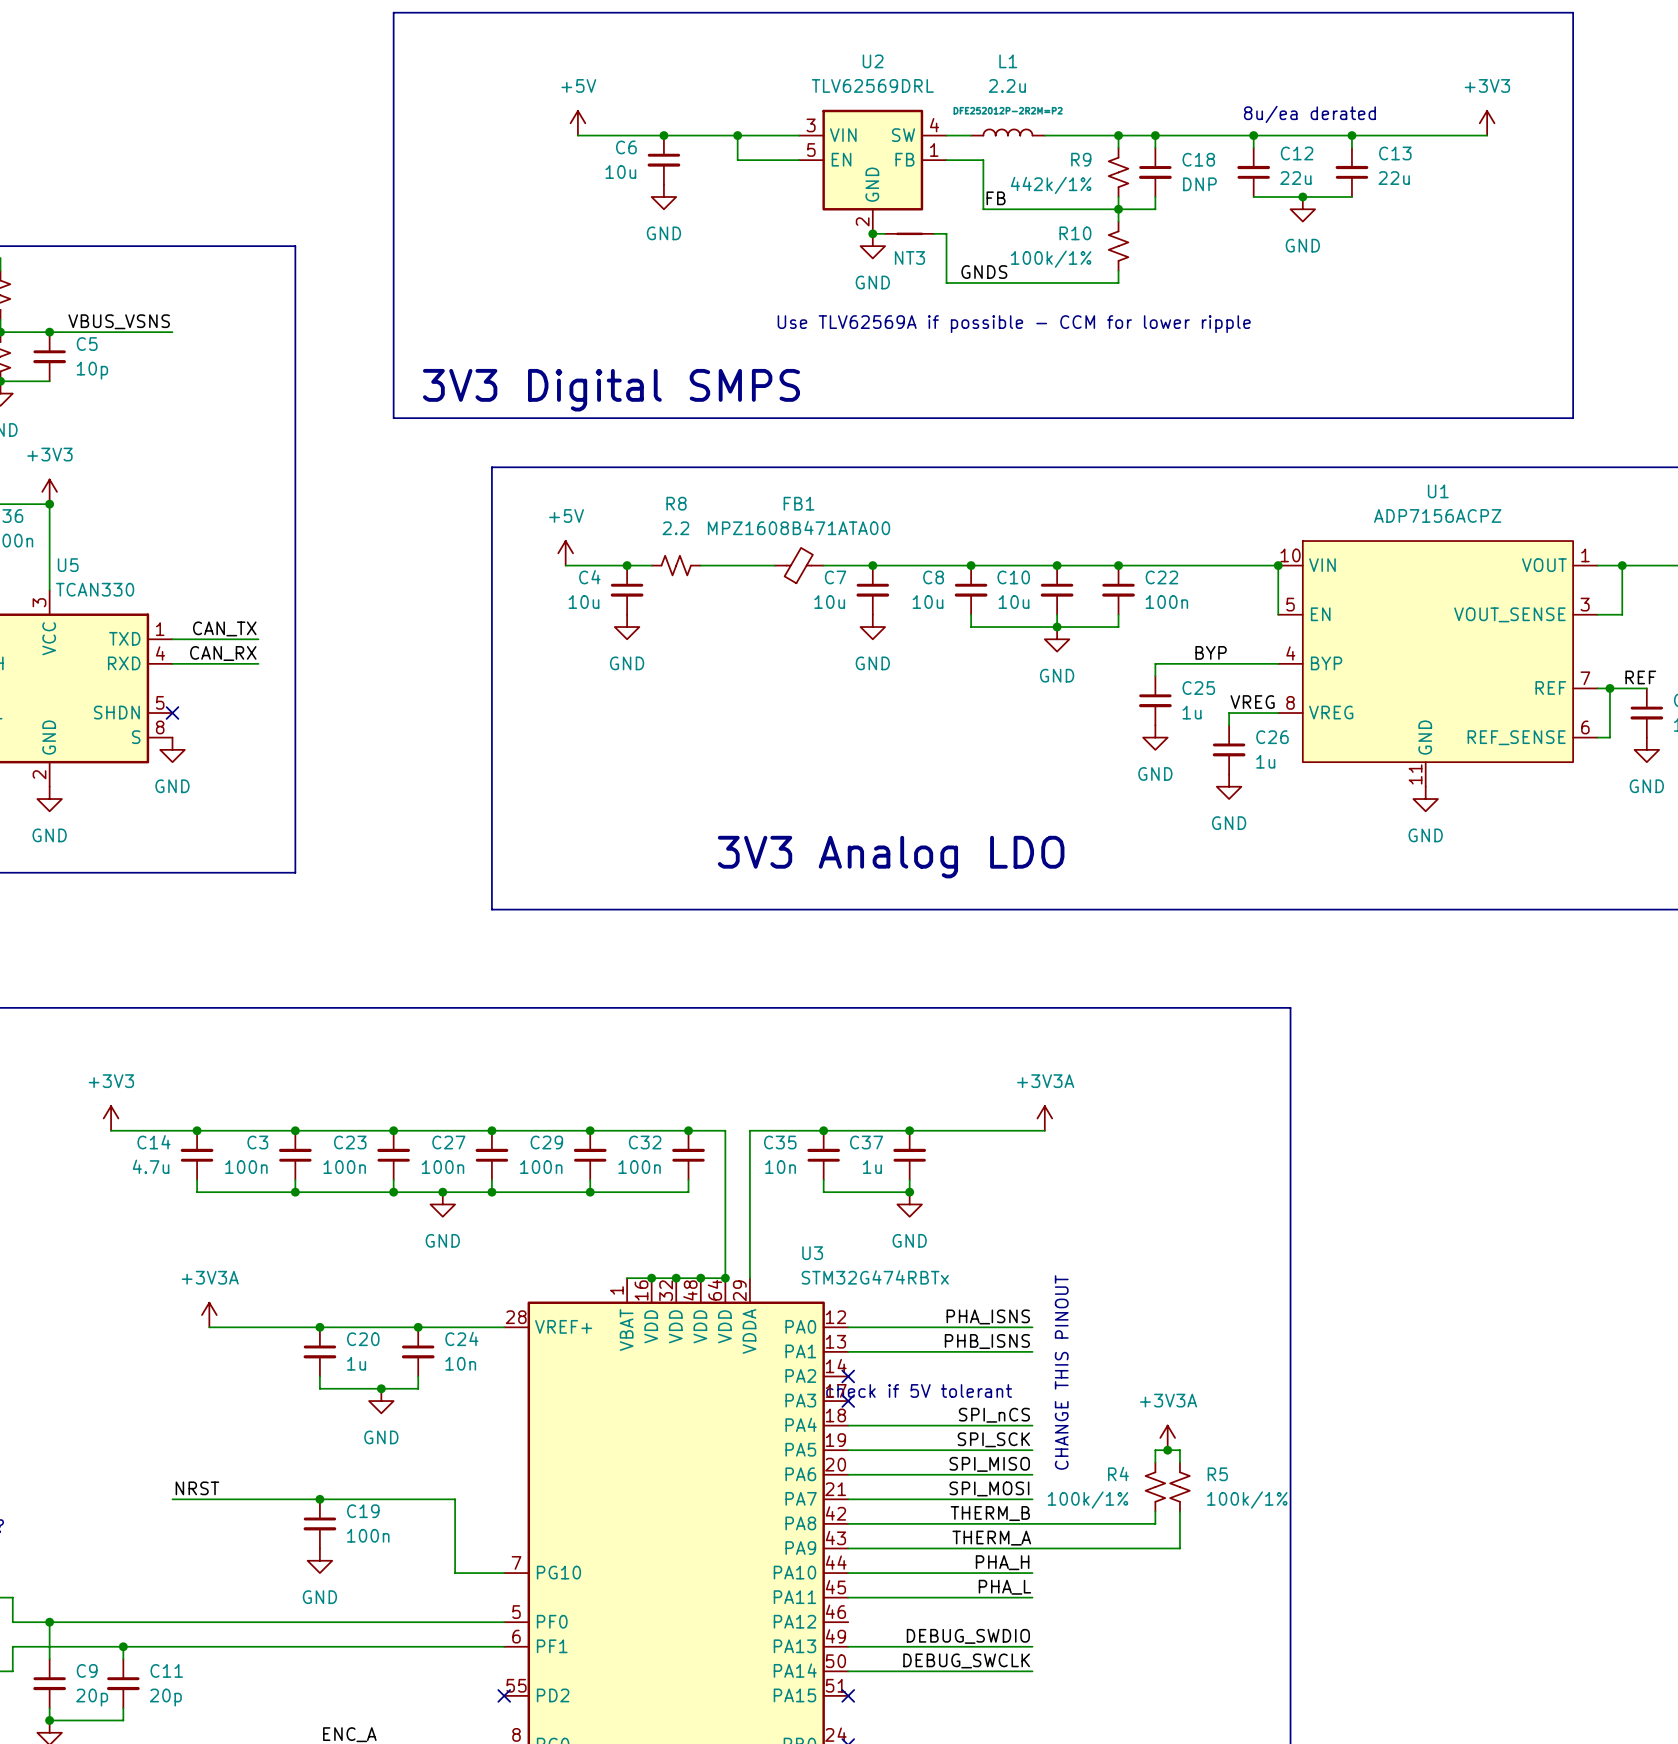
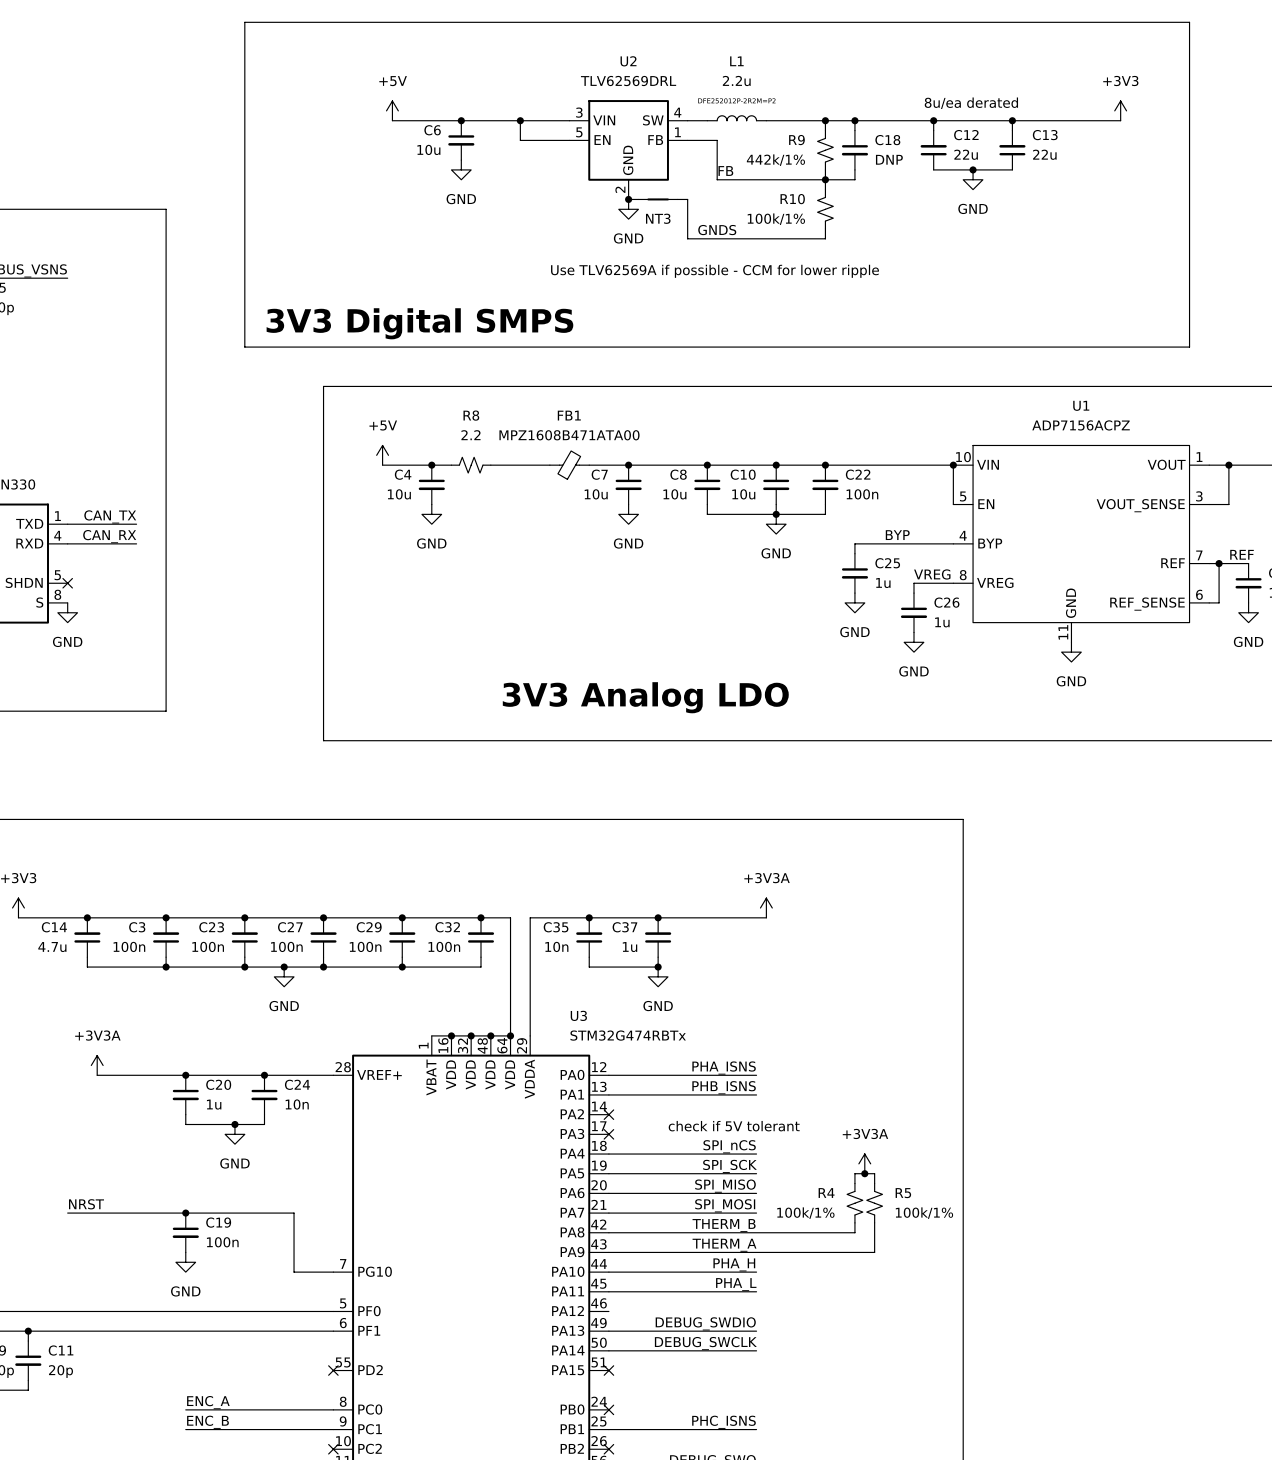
text: CHANGE THIS PINOUT (1061, 1372) -> none
text position: check if 5V tolerant (919, 1390) -> check if 5V tolerant (734, 1126)

